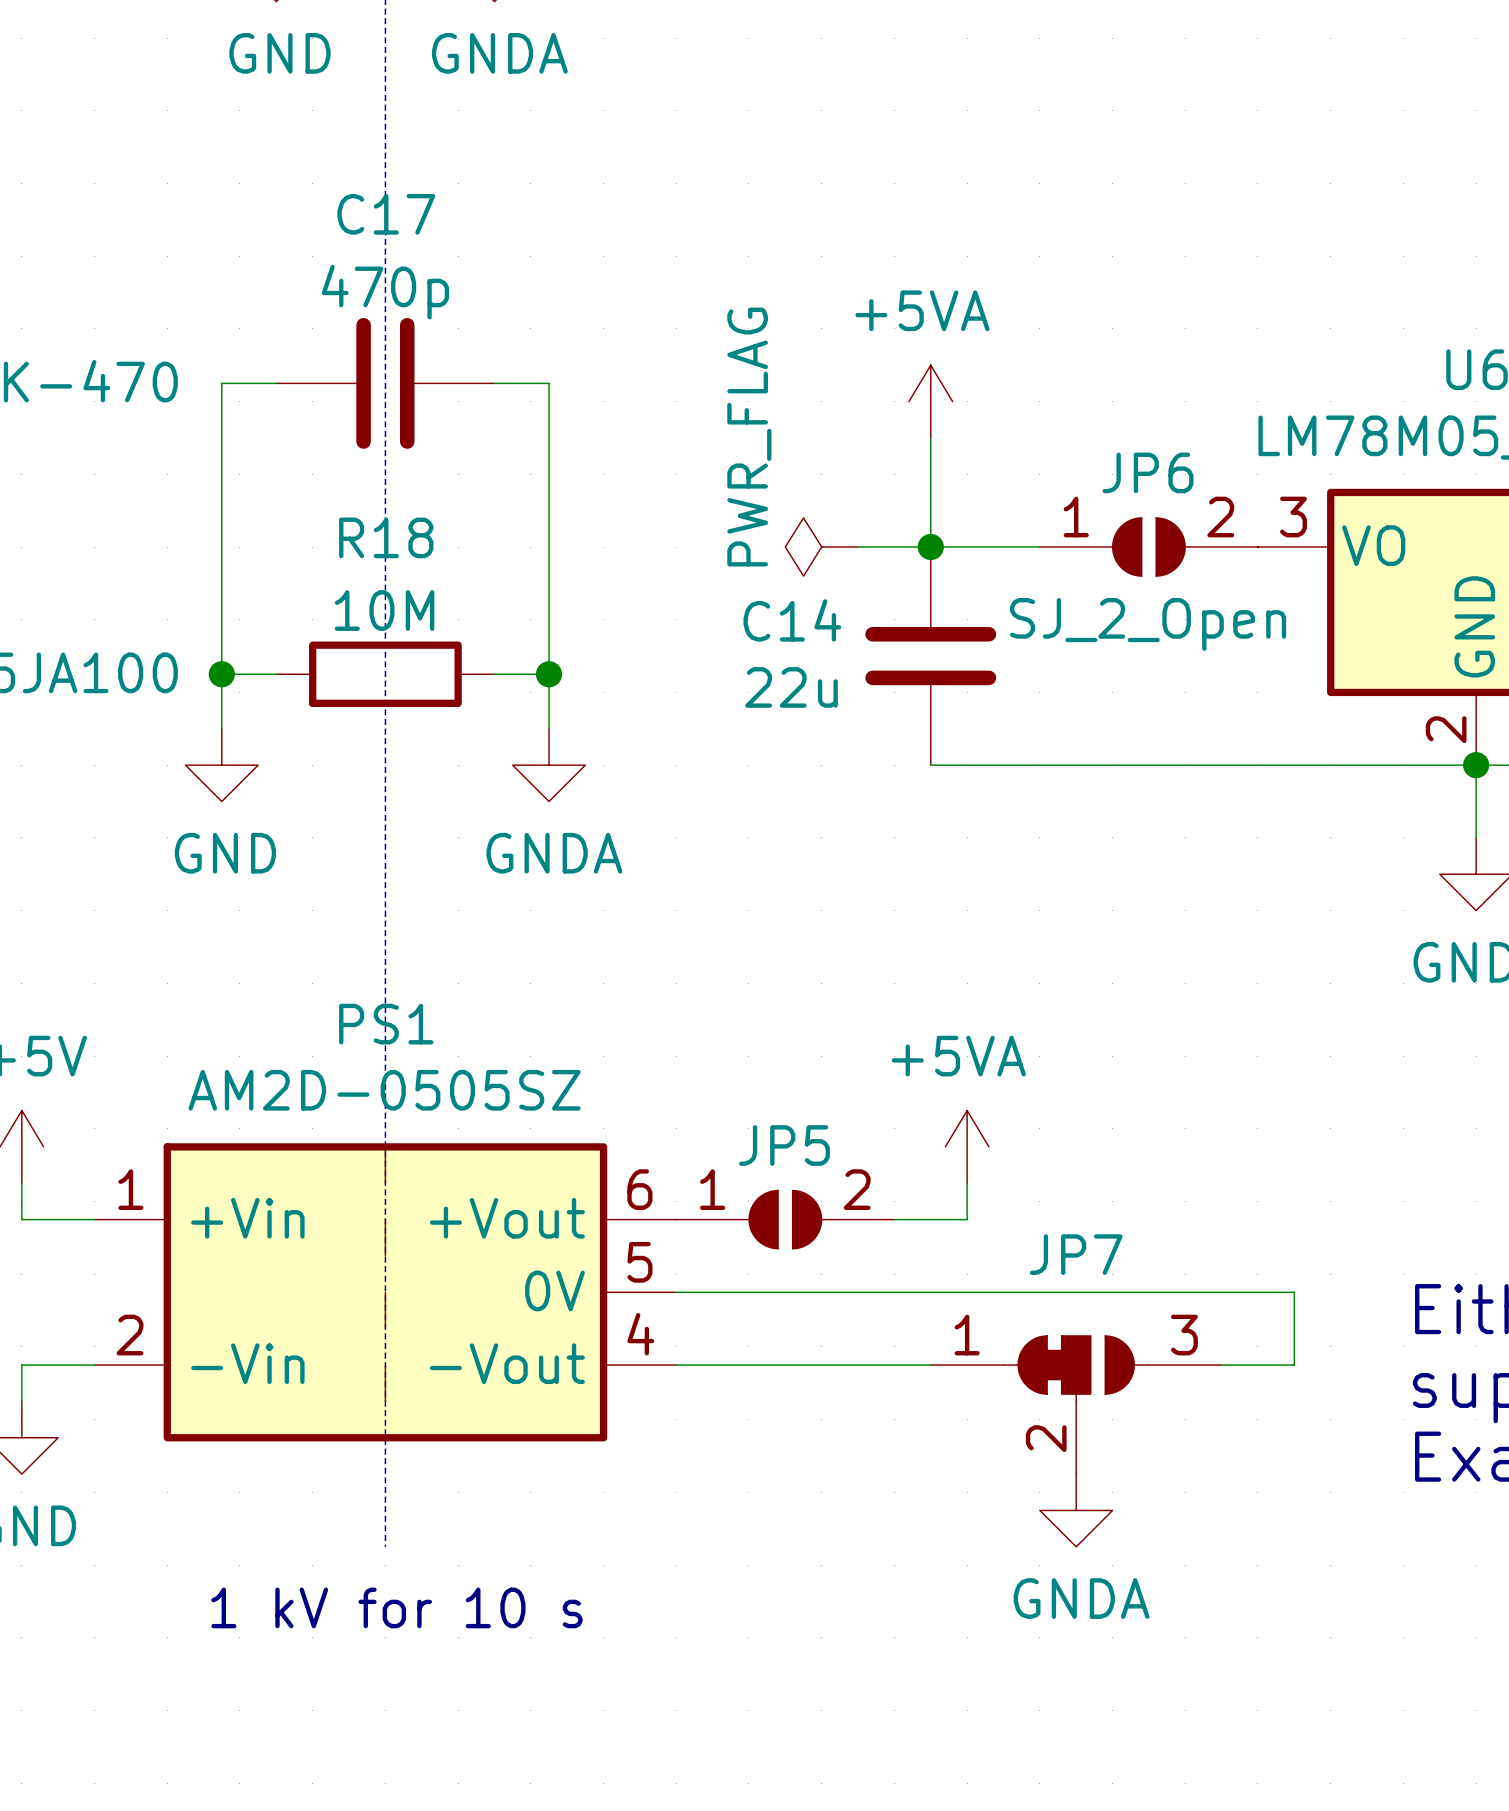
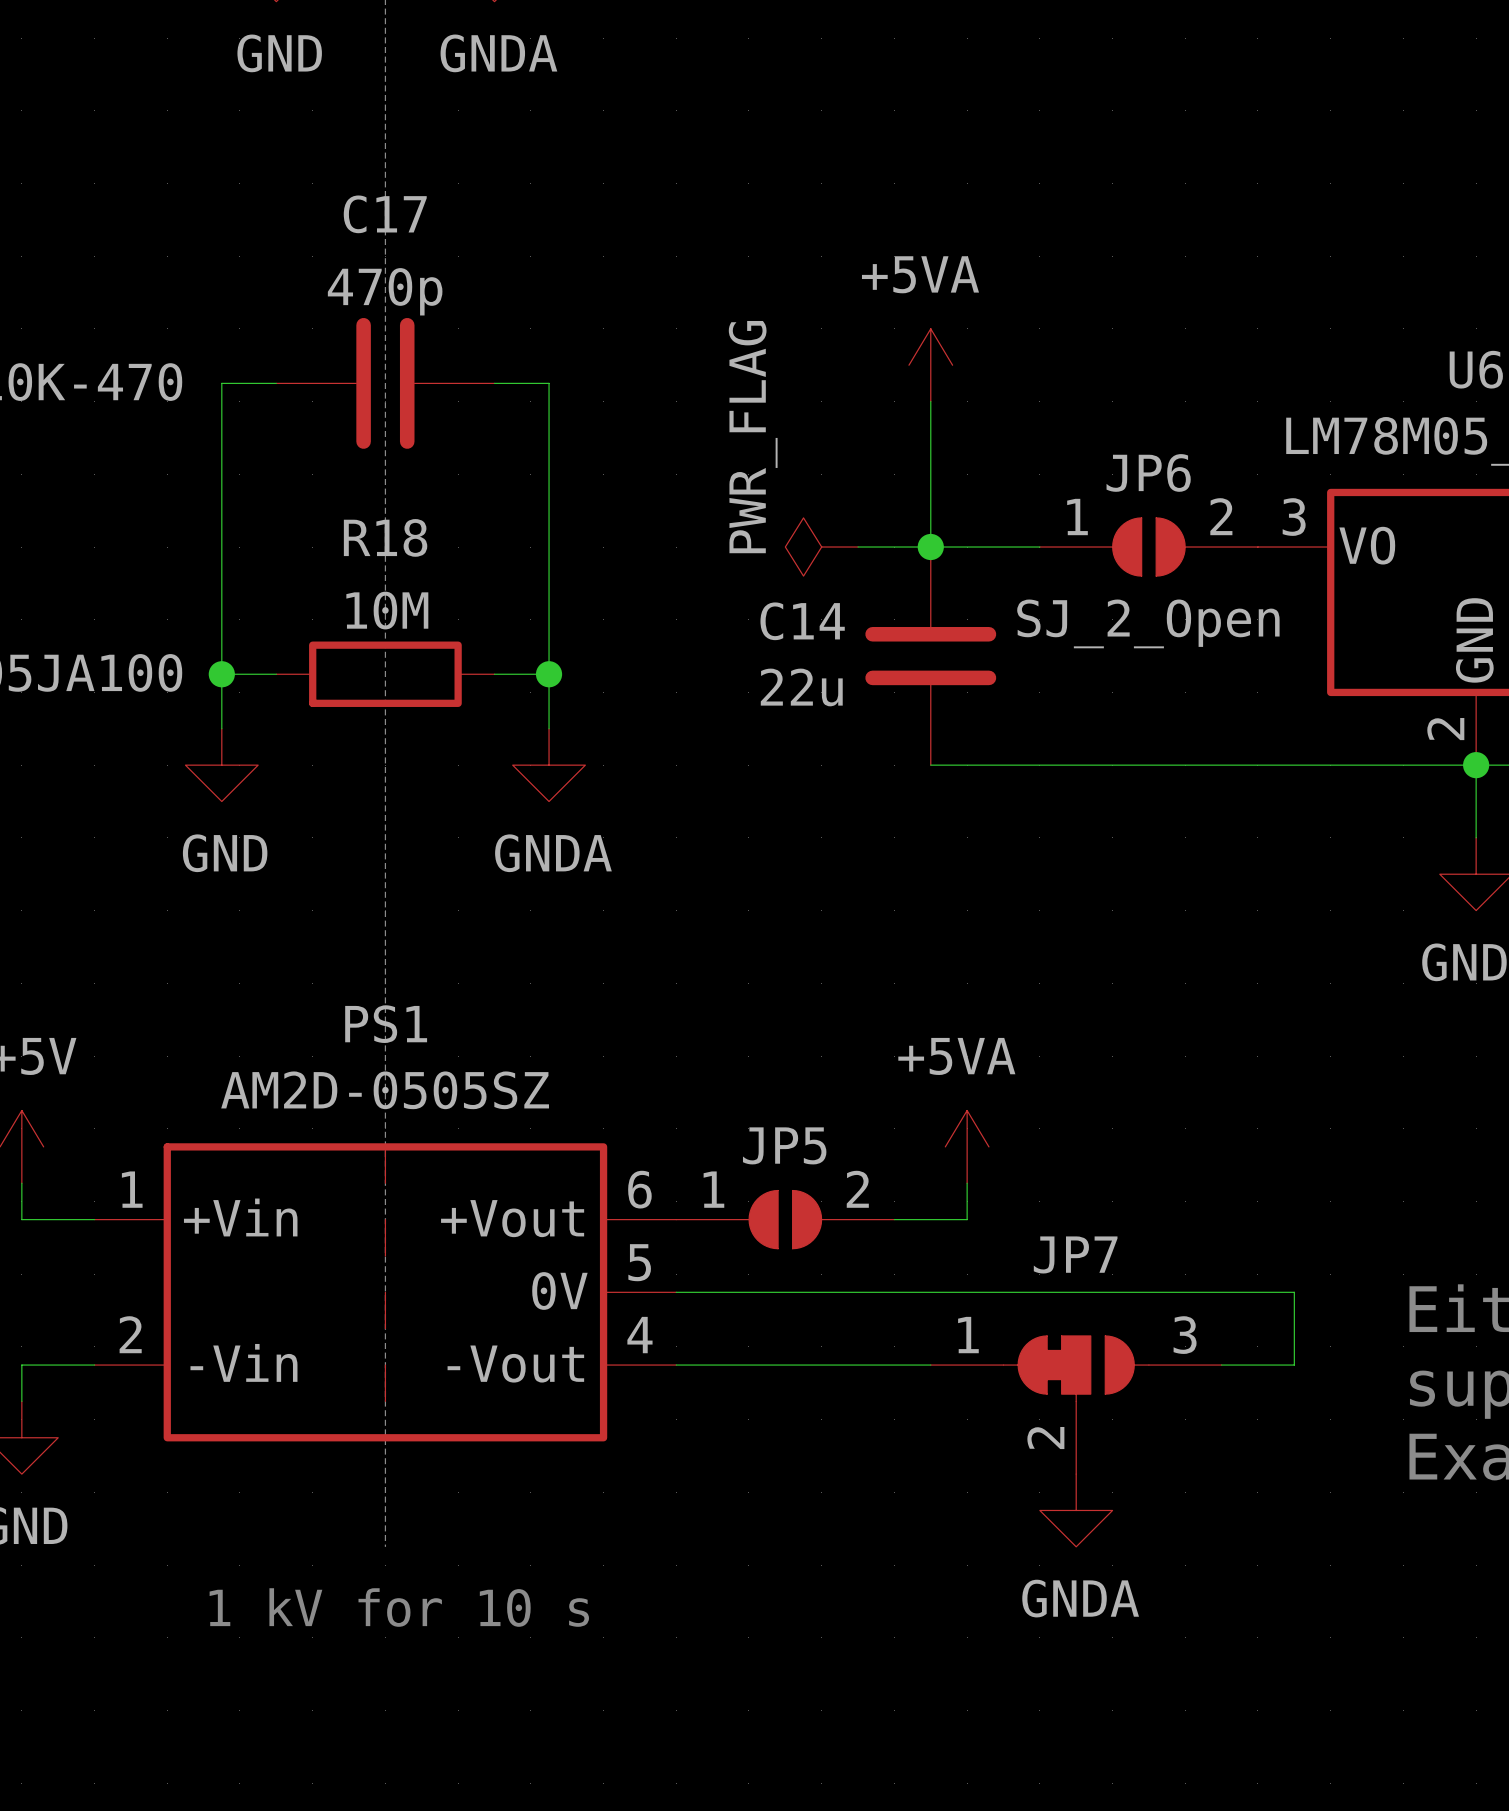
power symbol position: +5VA (930, 401) -> +5VA (930, 365)

